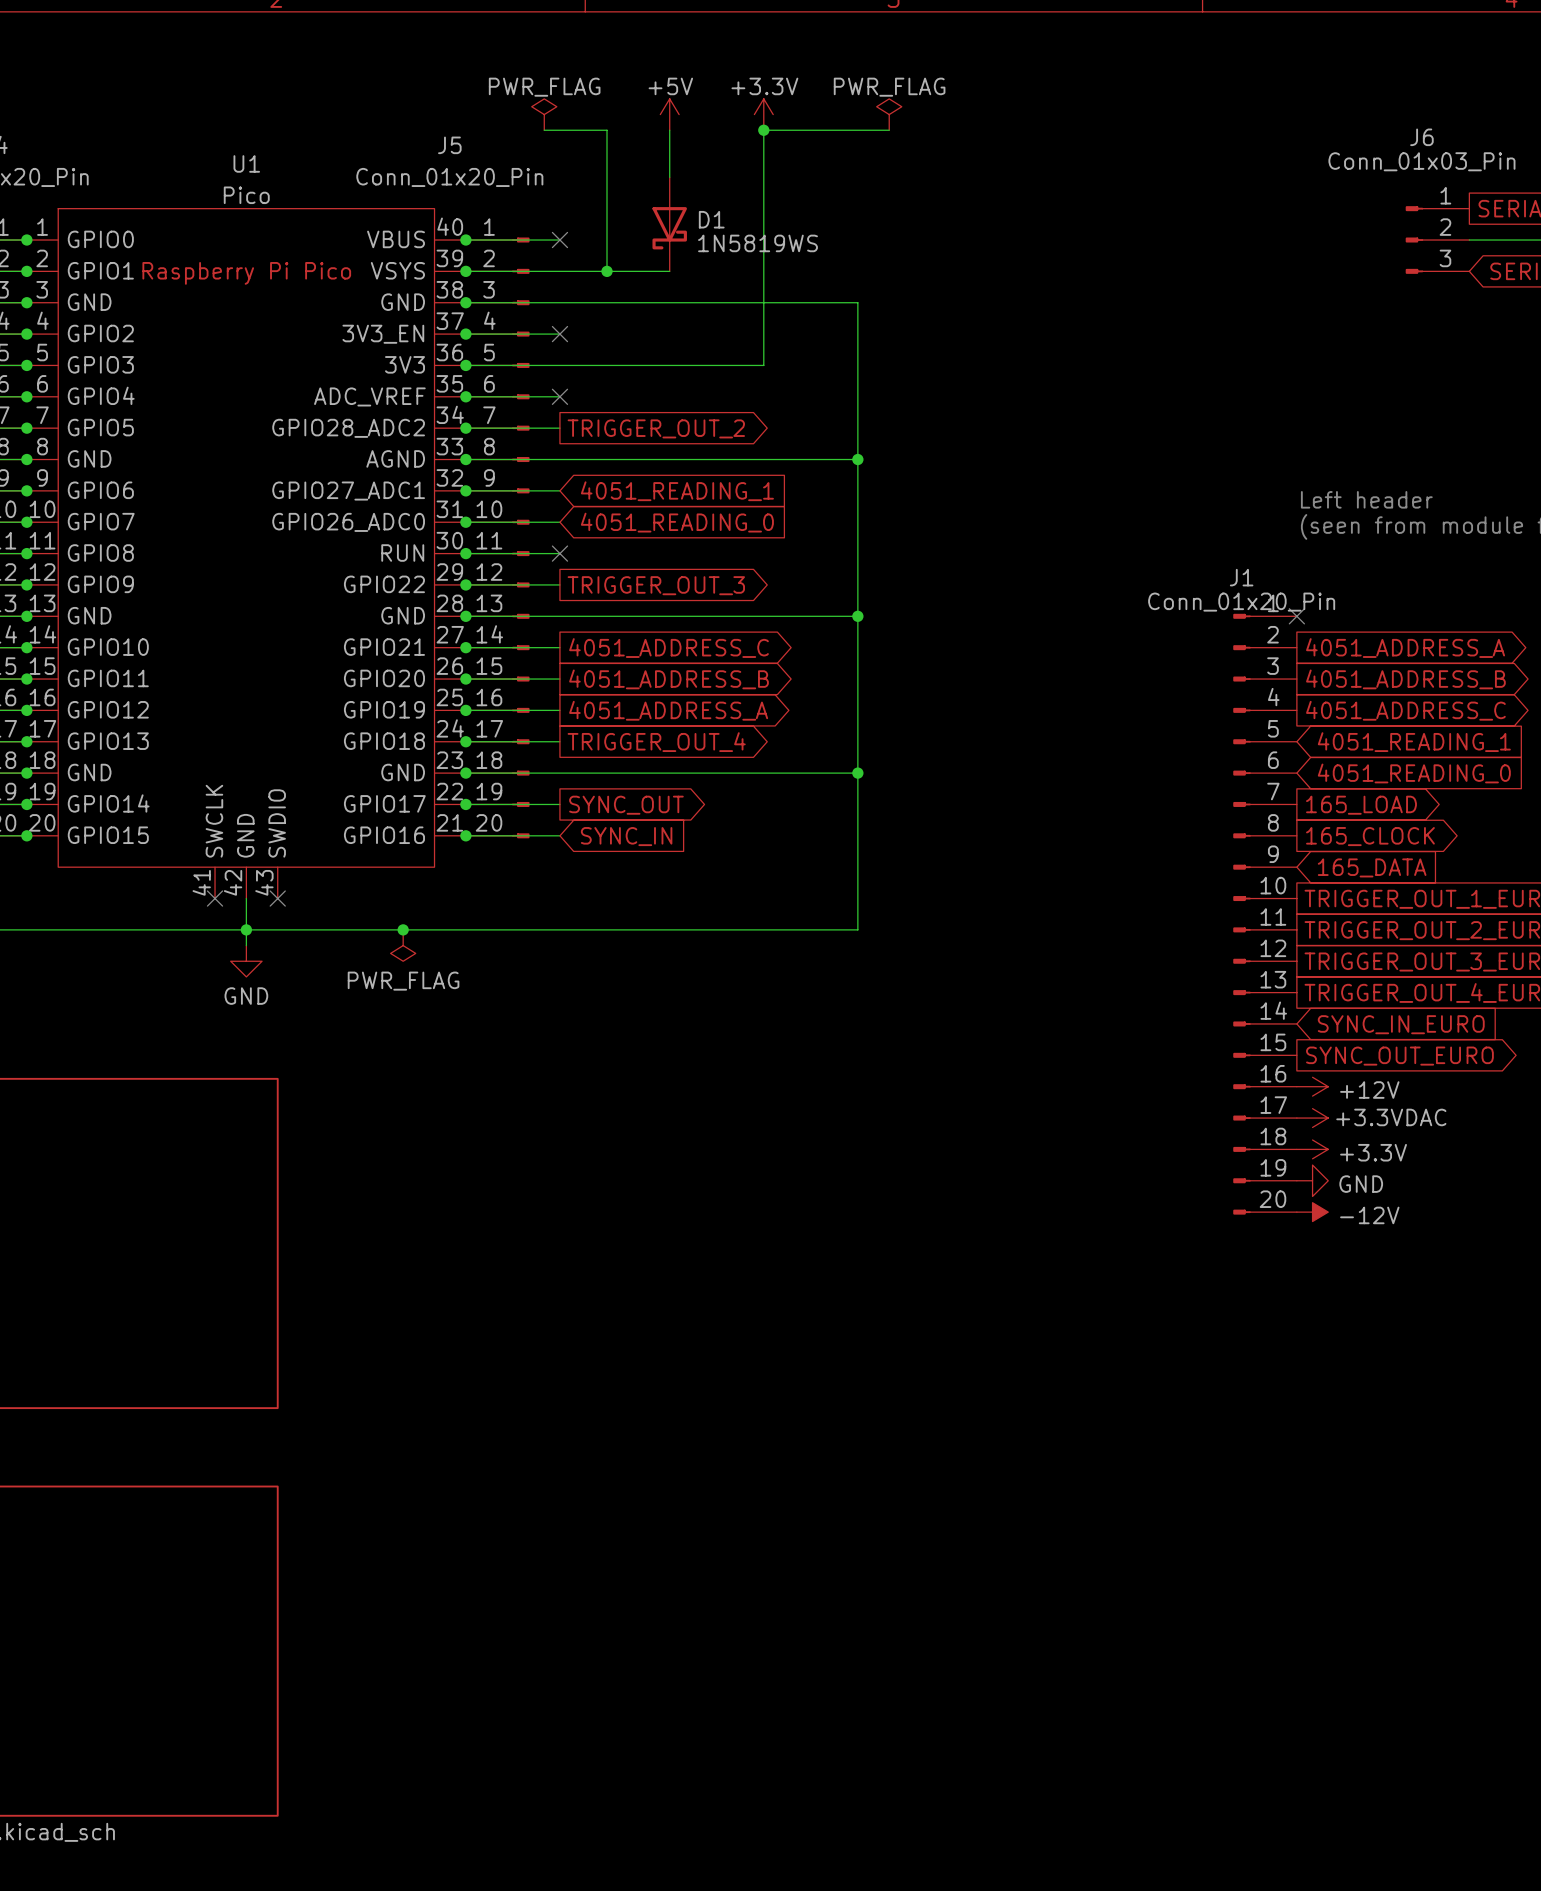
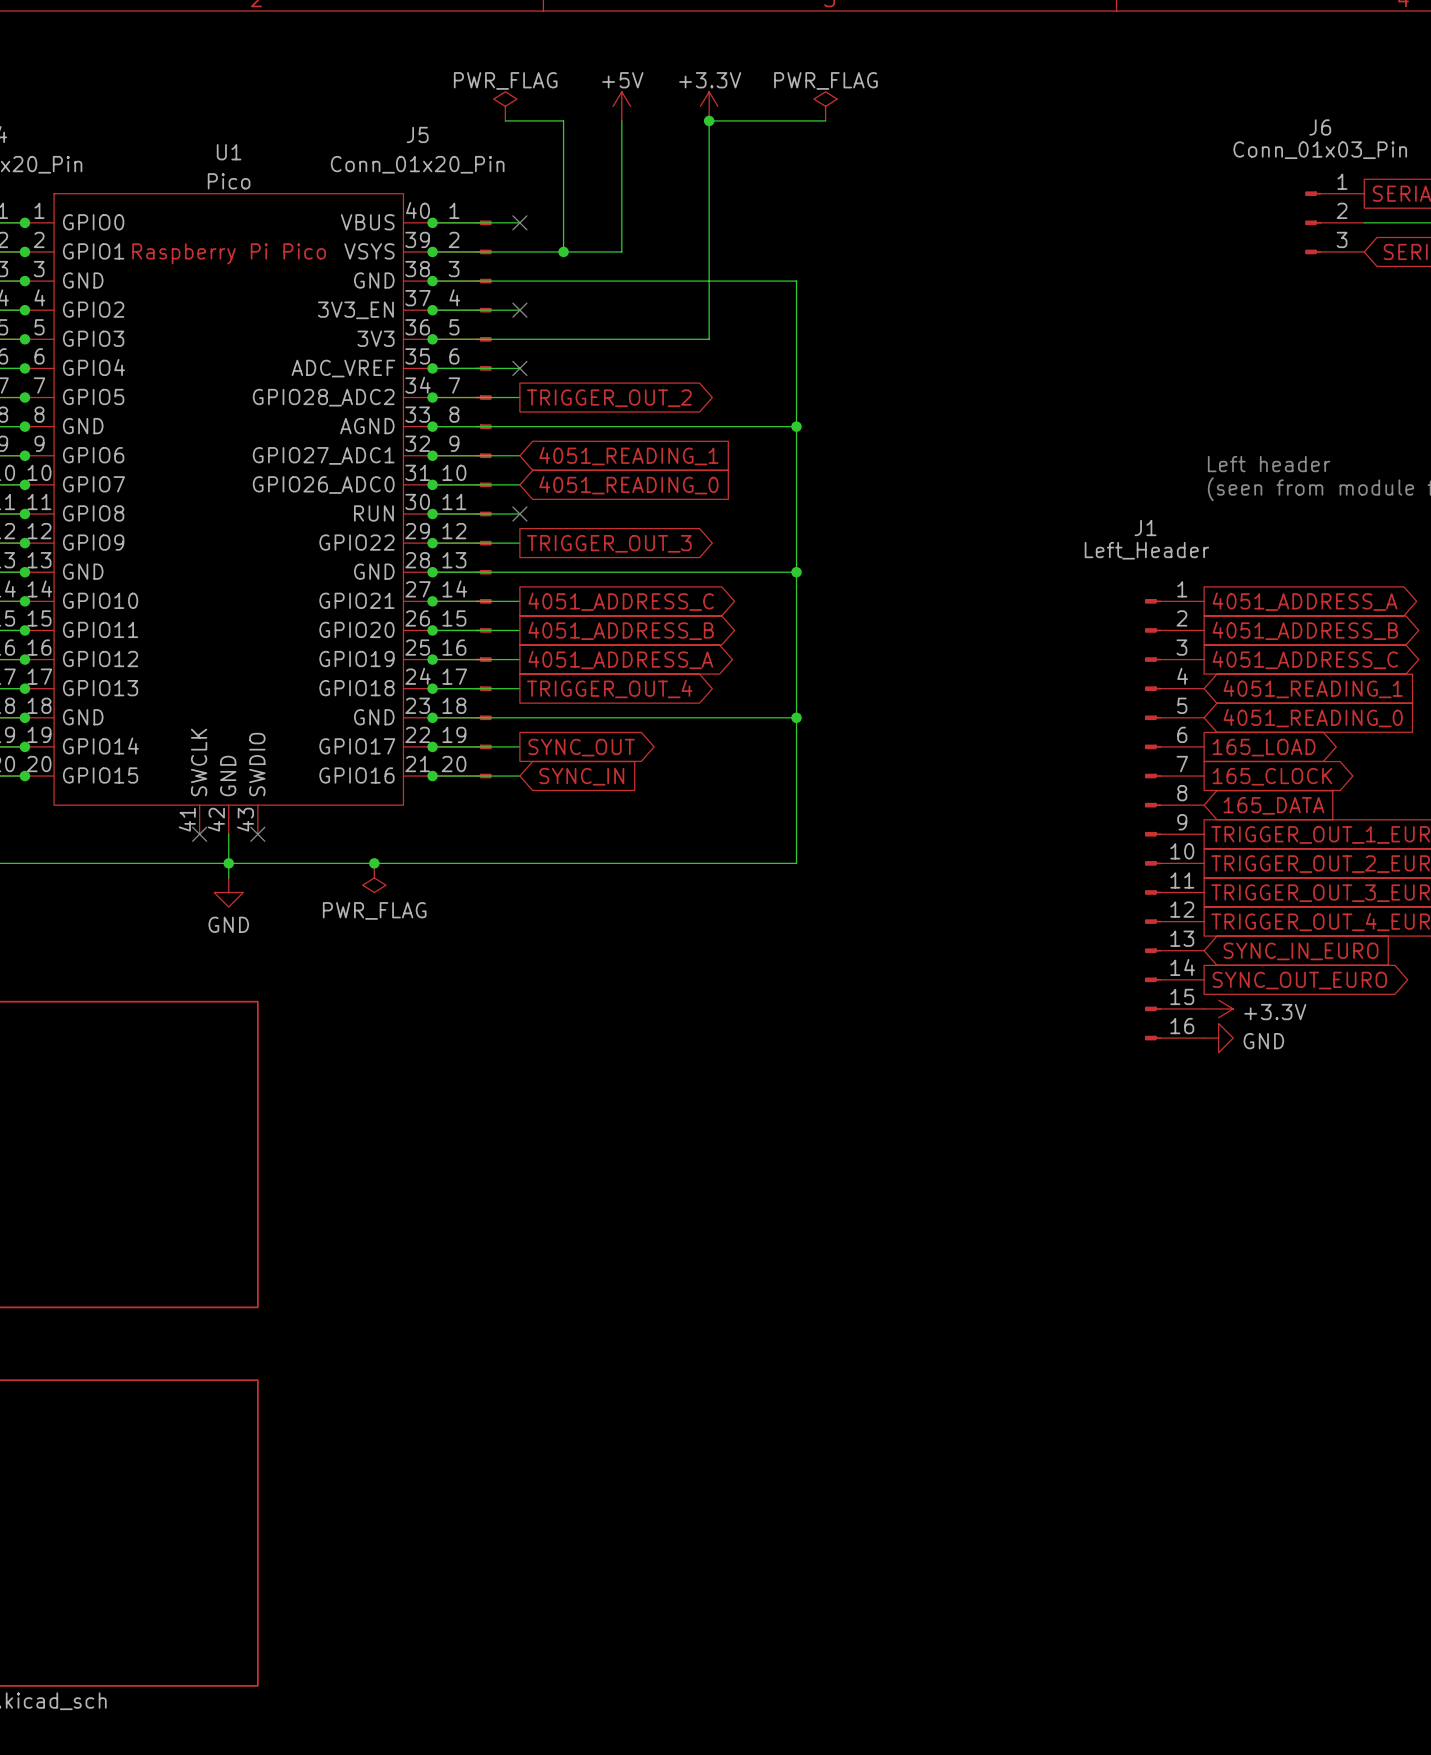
D1: 1N5819WS (669, 224) -> none
J1 value: Conn_01x20_Pin (1241, 602) -> Left_Header (1146, 550)
J1 symbol: [1233, 613, 1297, 1215] -> [1145, 599, 1205, 1041]
no-connect mark: (1296, 616) -> none
power symbol: +12V (1312, 1086) -> +3.3V (1218, 1008)
power symbol: +3.3VDAC (1312, 1118) -> GND (1218, 1038)
power symbol: +3.3V (1312, 1149) -> none
power symbol: GND (1312, 1180) -> none
power symbol: -12V (1312, 1212) -> none

